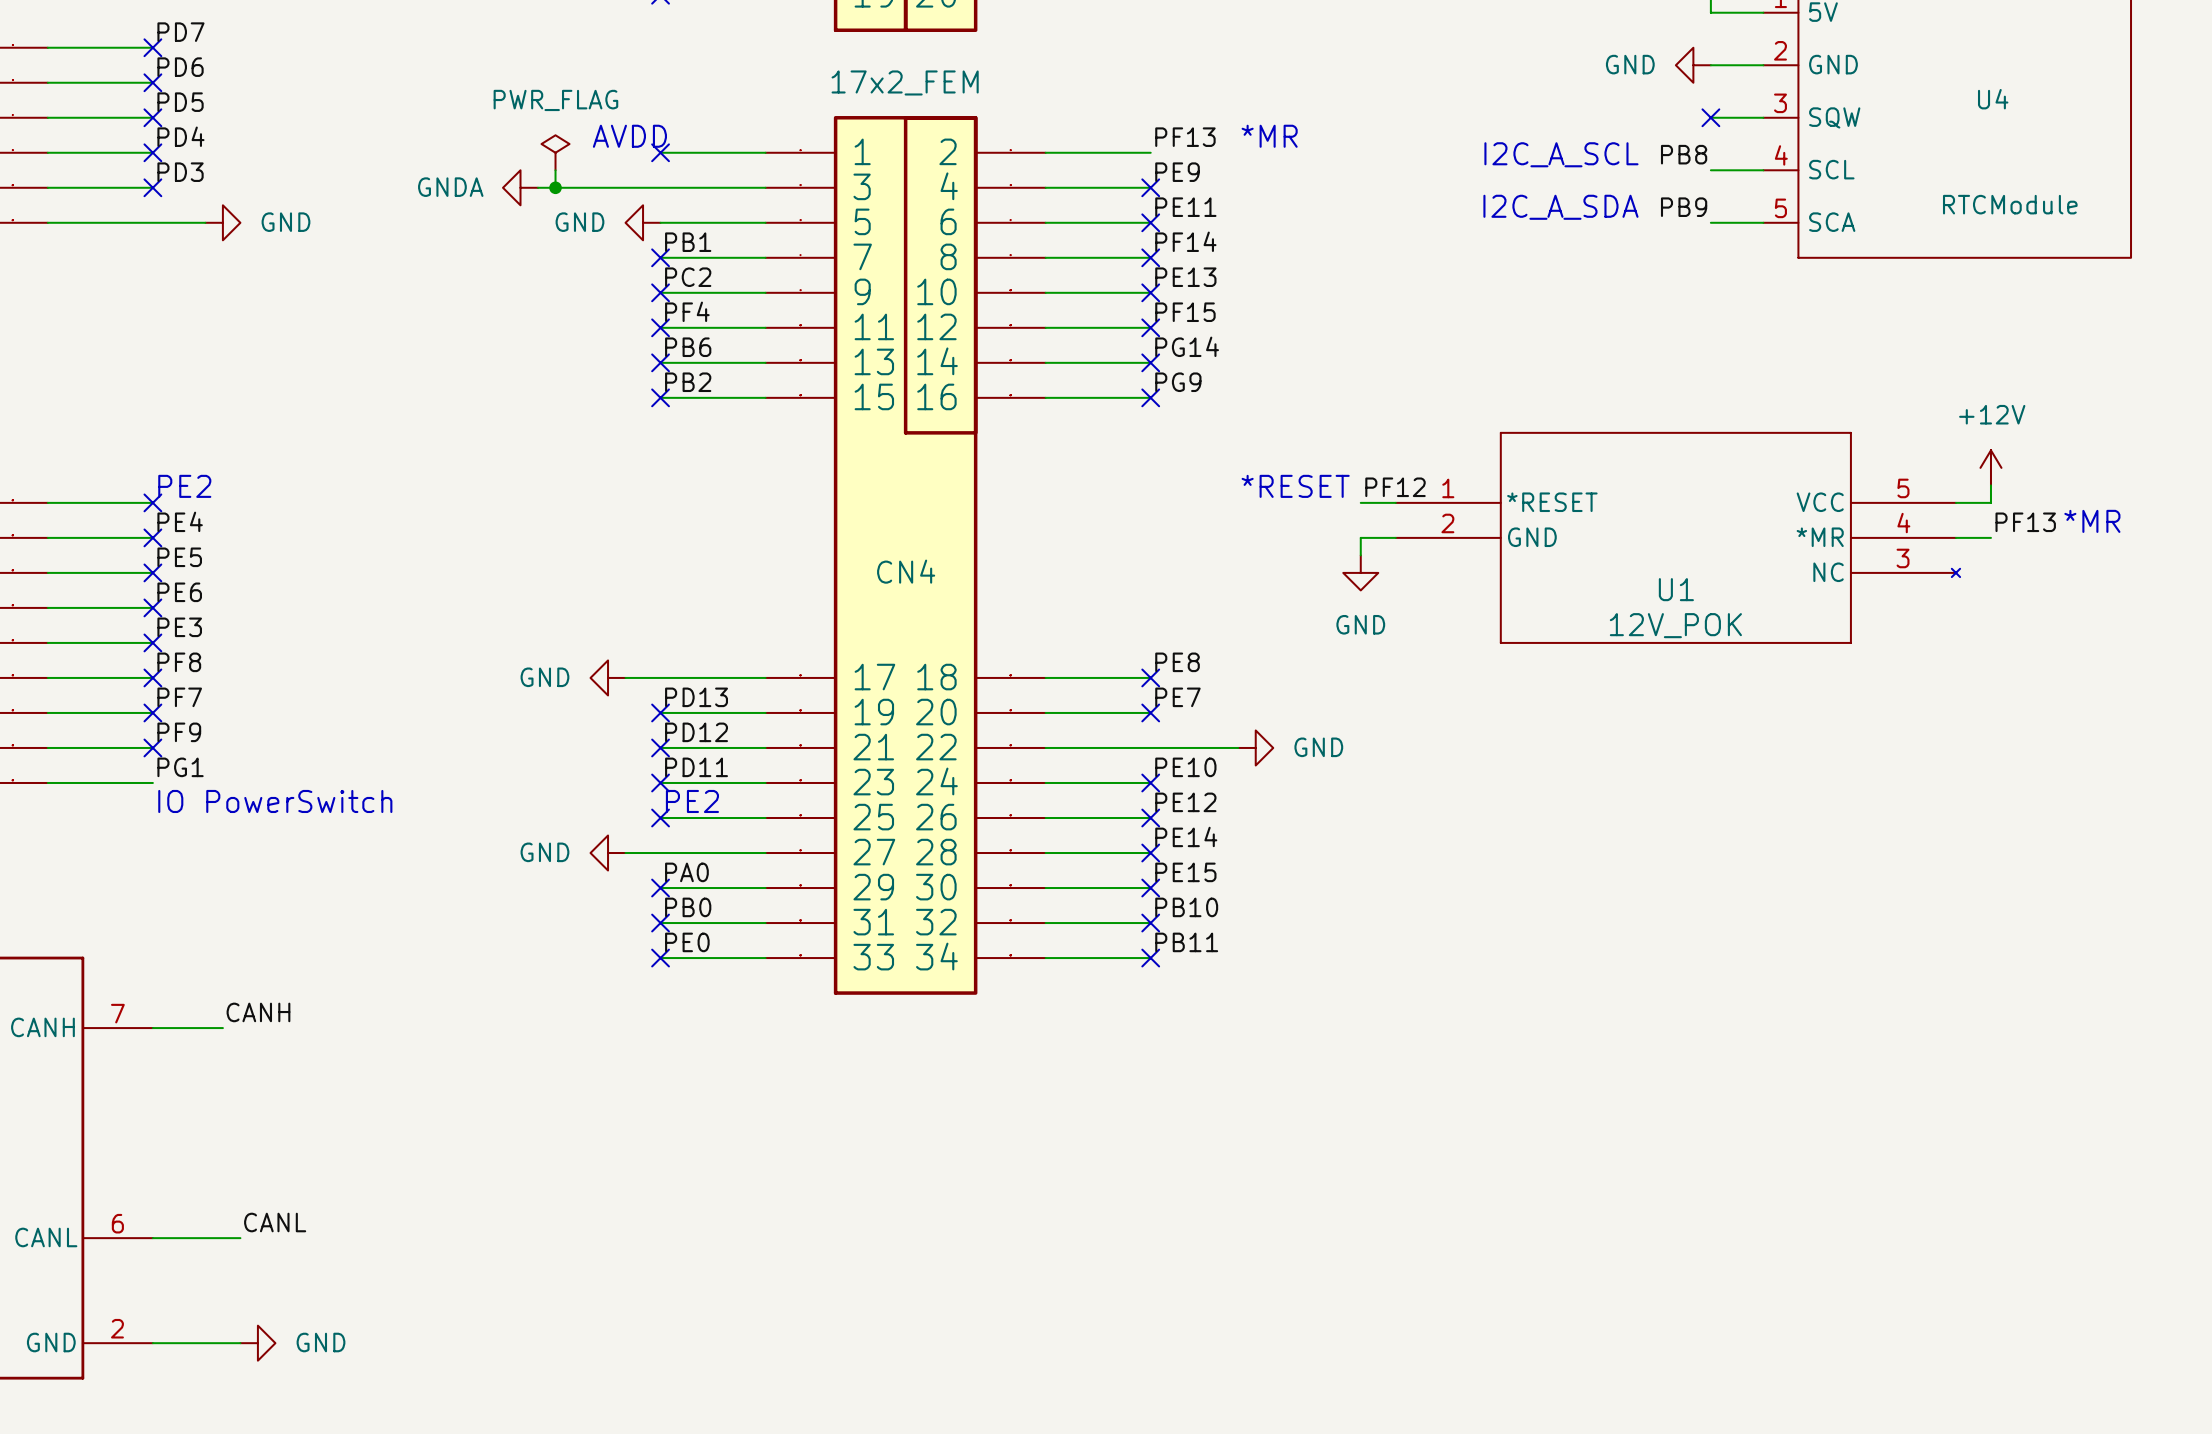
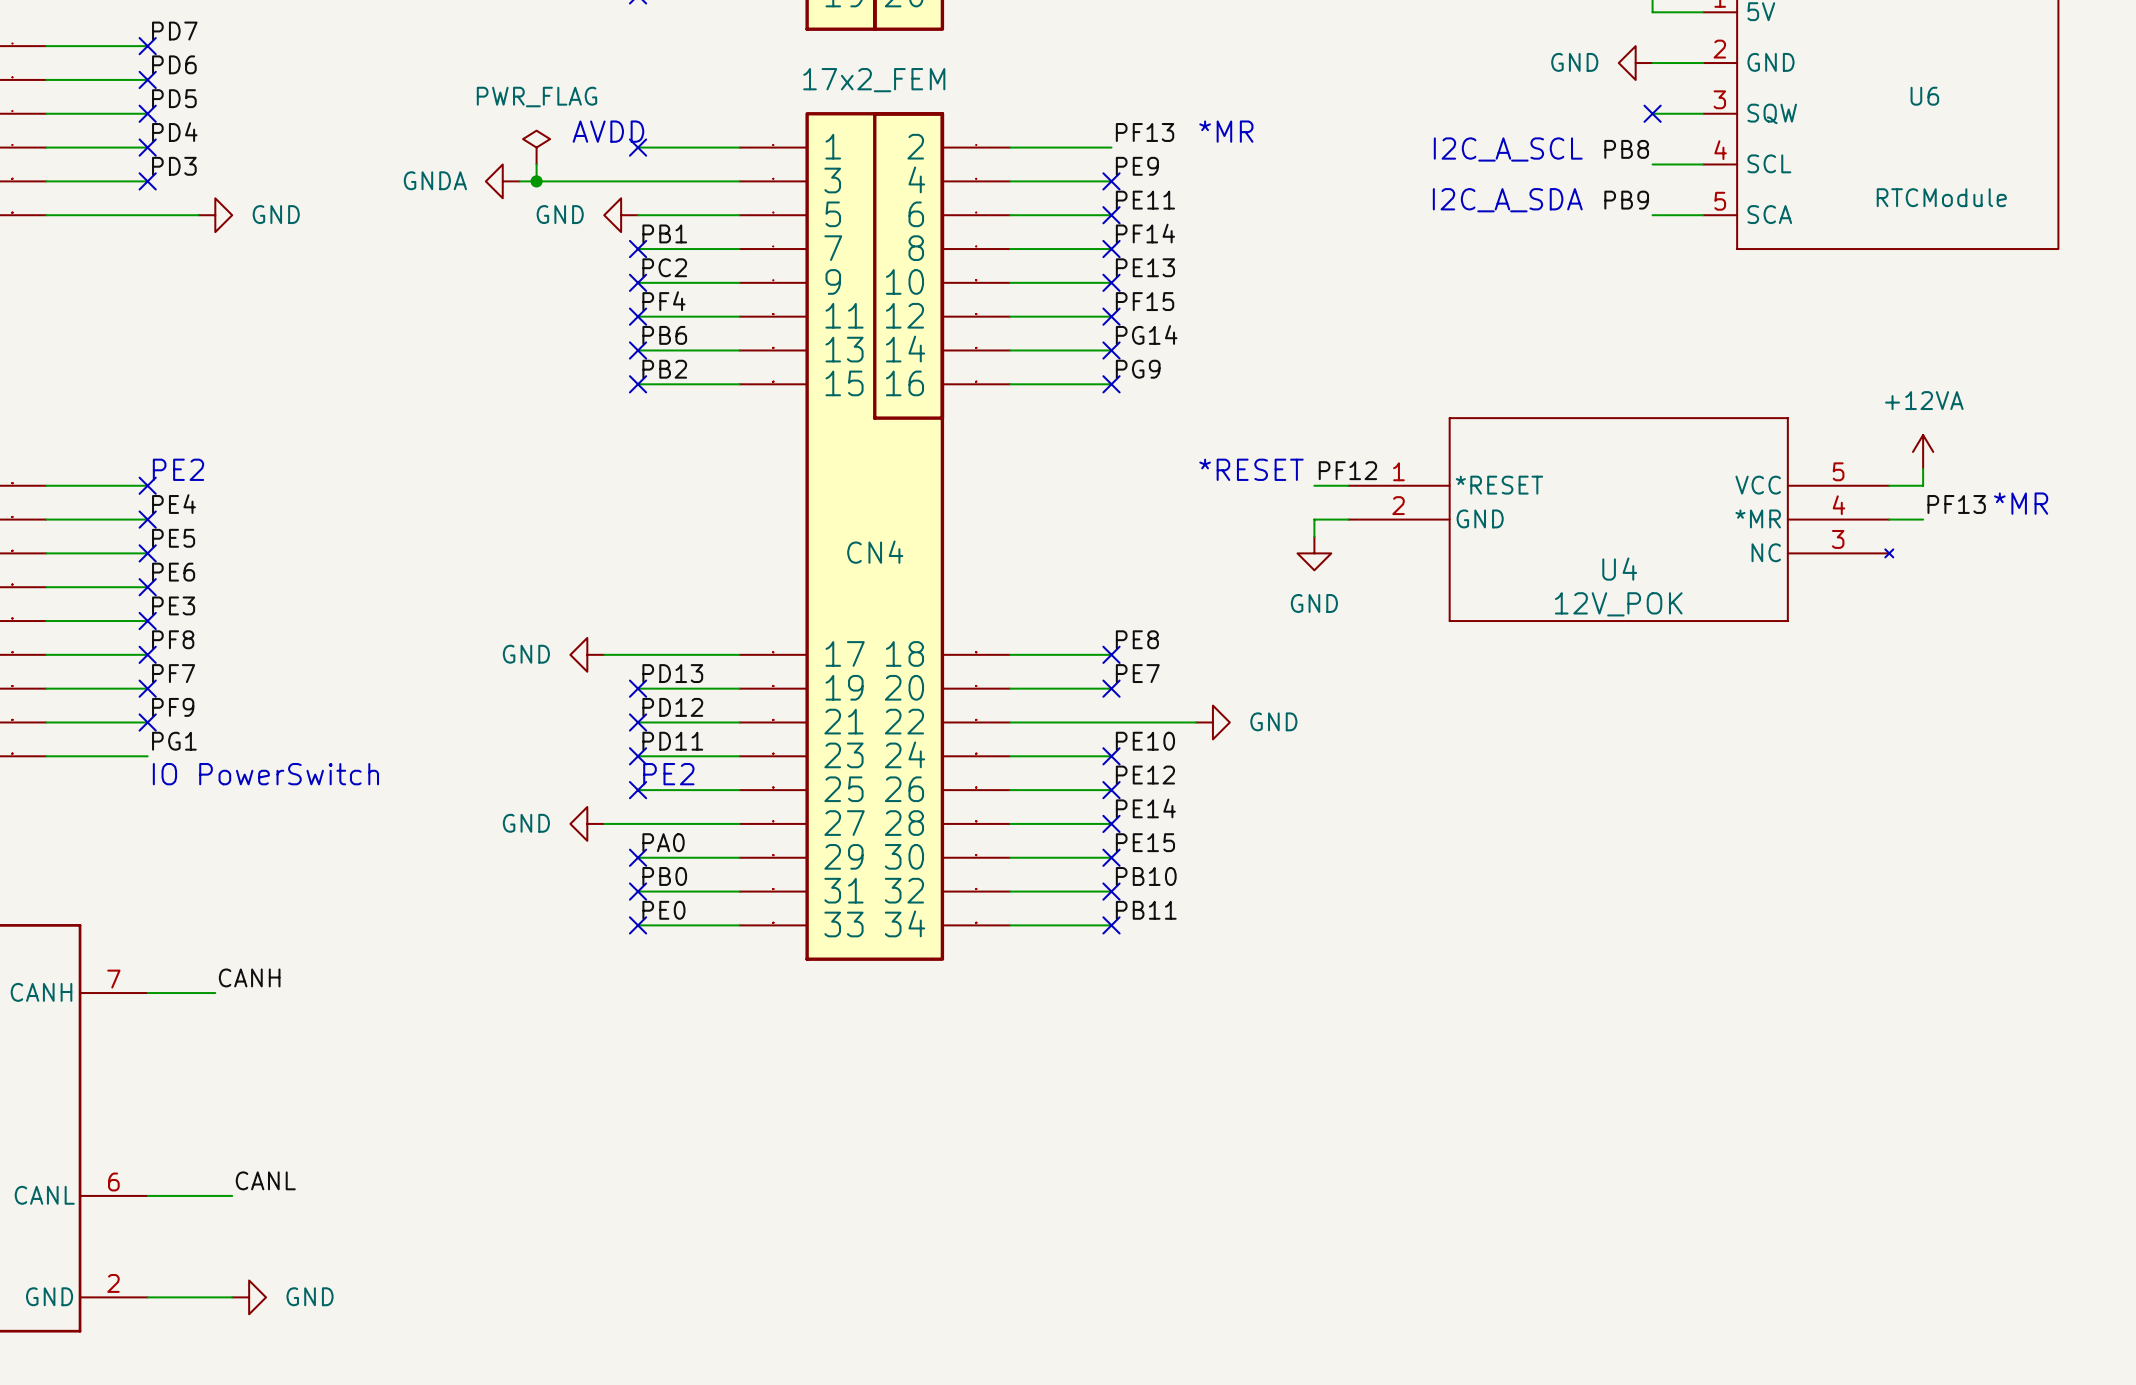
U4 name: U4 (1993, 99) -> U6 (1924, 96)
power symbol: +12V (1990, 467) -> +12VA (1923, 451)
U1 name: U1 (1676, 589) -> U4 (1619, 569)

